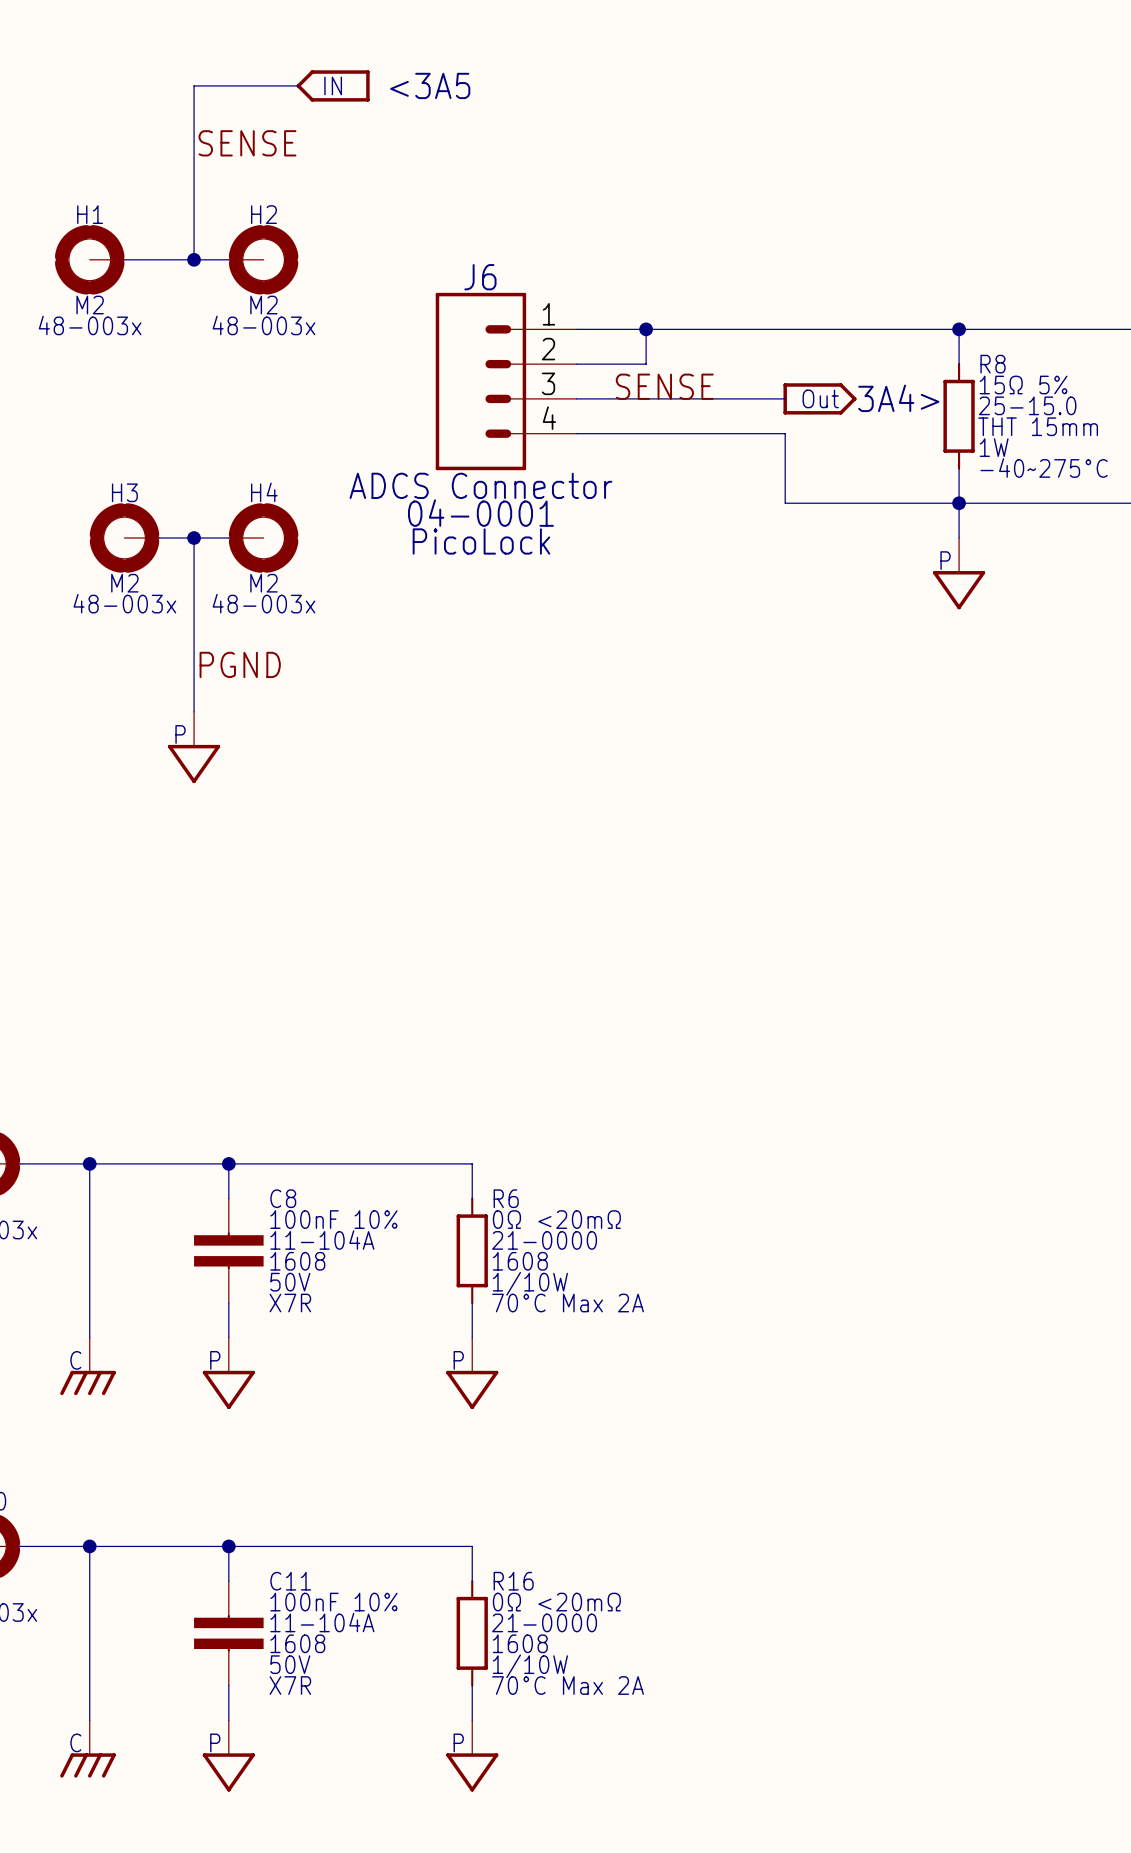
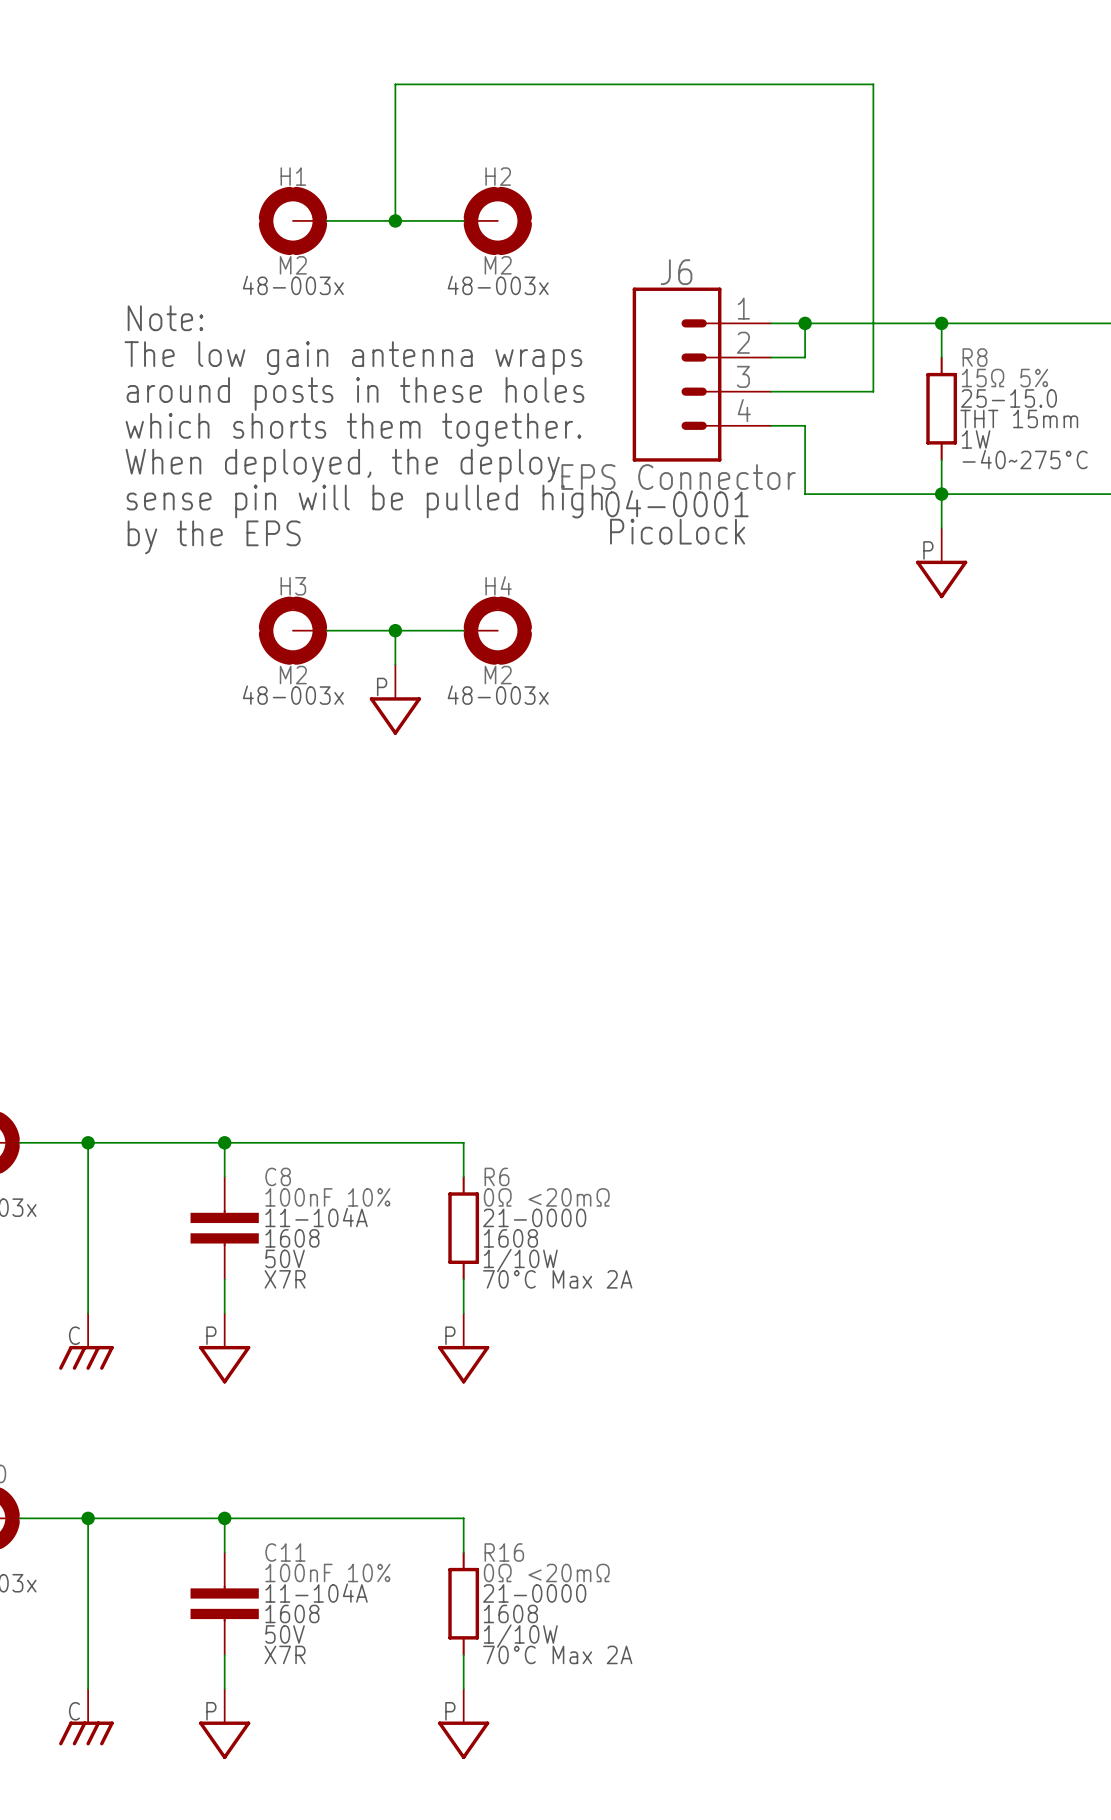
wire: (298, 85) (194, 85) (194, 259) -> none
part: (333, 85) -> none
text: <3A5 (430, 85) -> none
label: SENSE (247, 143) -> none
wire: none -> (327, 220) (463, 220)
junction: none -> (395, 220)
H1 position: (89, 259) -> (292, 220)
wire: (124, 259) (228, 259) -> none
junction: (194, 259) -> none
H2 position: (263, 259) -> (497, 220)
text: none -> Note: (165, 318)
wire: (576, 329) (785, 329) -> none
wire: (646, 329) (646, 364) (576, 364) -> none
junction: (646, 329) -> none
wire: none -> (805, 323) (805, 357) (770, 357)
junction: none -> (805, 323)
text: none -> The low gain antenna wraps (353, 358)
J6 position: (506, 381) -> (701, 374)
label: SENSE (664, 386) -> none
wire: (576, 398) (785, 398) -> (395, 220) (395, 84) (873, 84) (873, 391) (770, 391)
part: (819, 398) -> none
text: 3A4> (898, 398) -> none
text: none -> around posts in these holes (355, 393)
wire: (576, 433) (785, 433) (785, 503) (819, 503) -> (770, 425) (805, 425) (805, 494)
text: none -> which shorts them together. (353, 429)
text: none -> When deployed, the deploy (342, 465)
J6 value: ADCS Connector (480, 485) -> EPS Connector (678, 477)
text: none -> sense pin will be pulled high (364, 501)
H3 position: (124, 538) -> (292, 630)
wire: (159, 538) (228, 538) -> none
wire: (194, 538) (194, 711) -> none
junction: (194, 538) -> none
H4 position: (263, 538) -> (497, 630)
text: none -> by the EPS (214, 537)
wire: none -> (327, 630) (463, 630)
wire: none -> (395, 630) (395, 664)
junction: none -> (395, 630)
label: PGND (240, 664) -> none
power symbol position: (194, 747) -> (395, 699)

